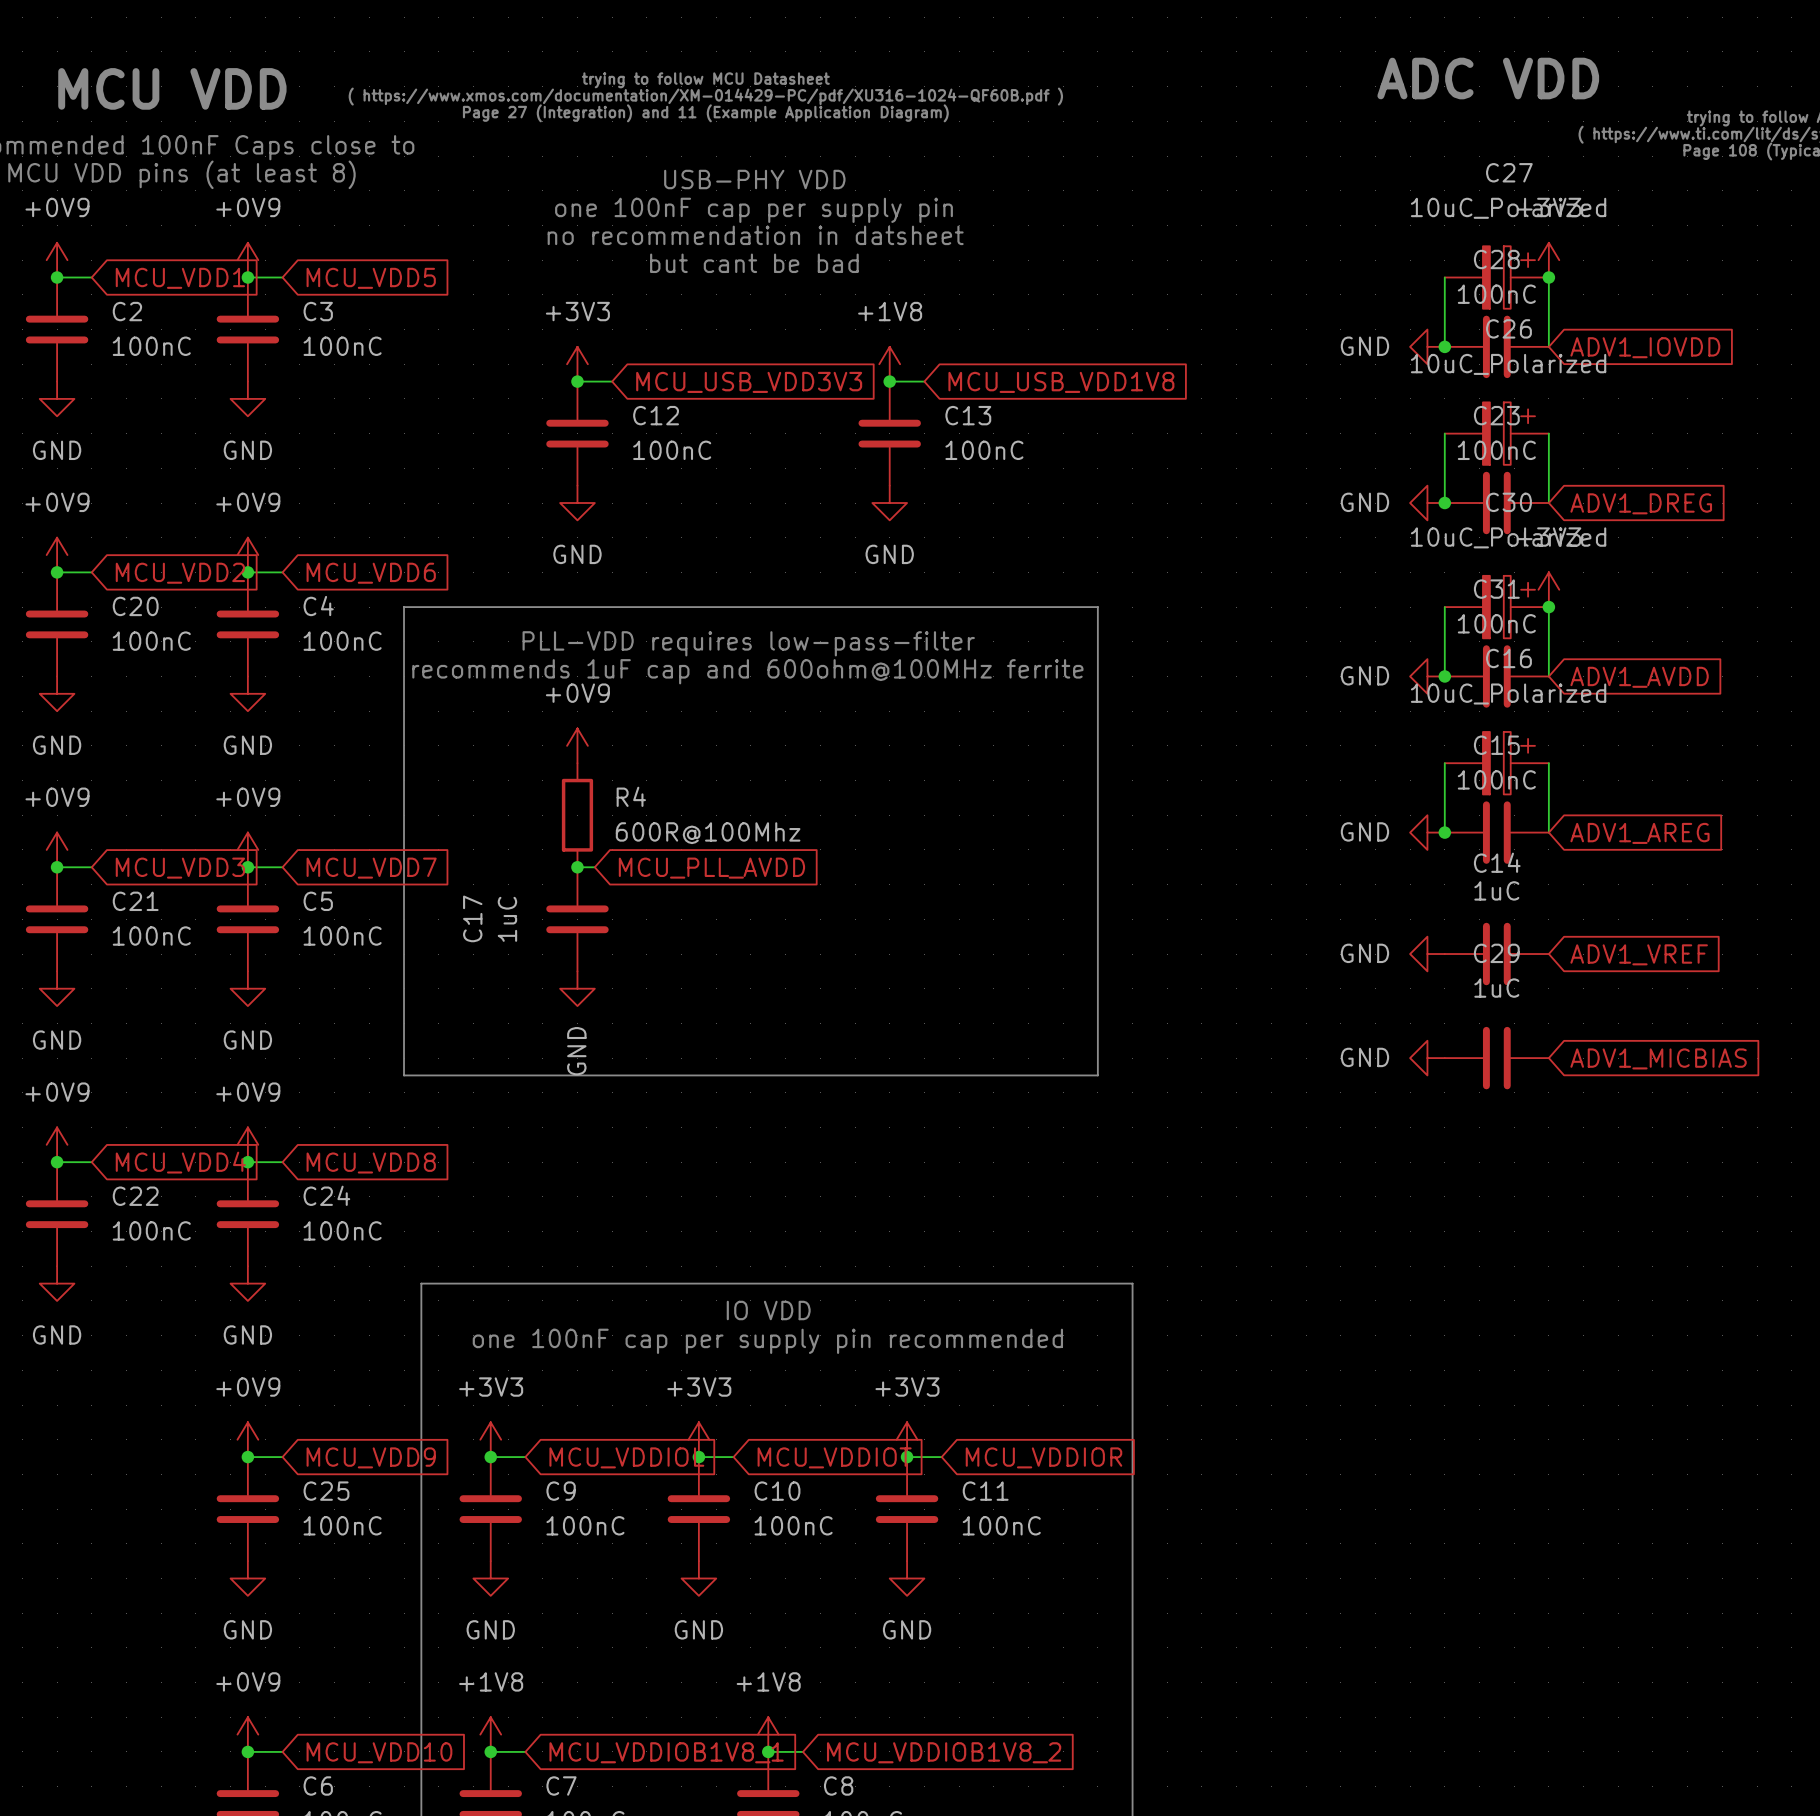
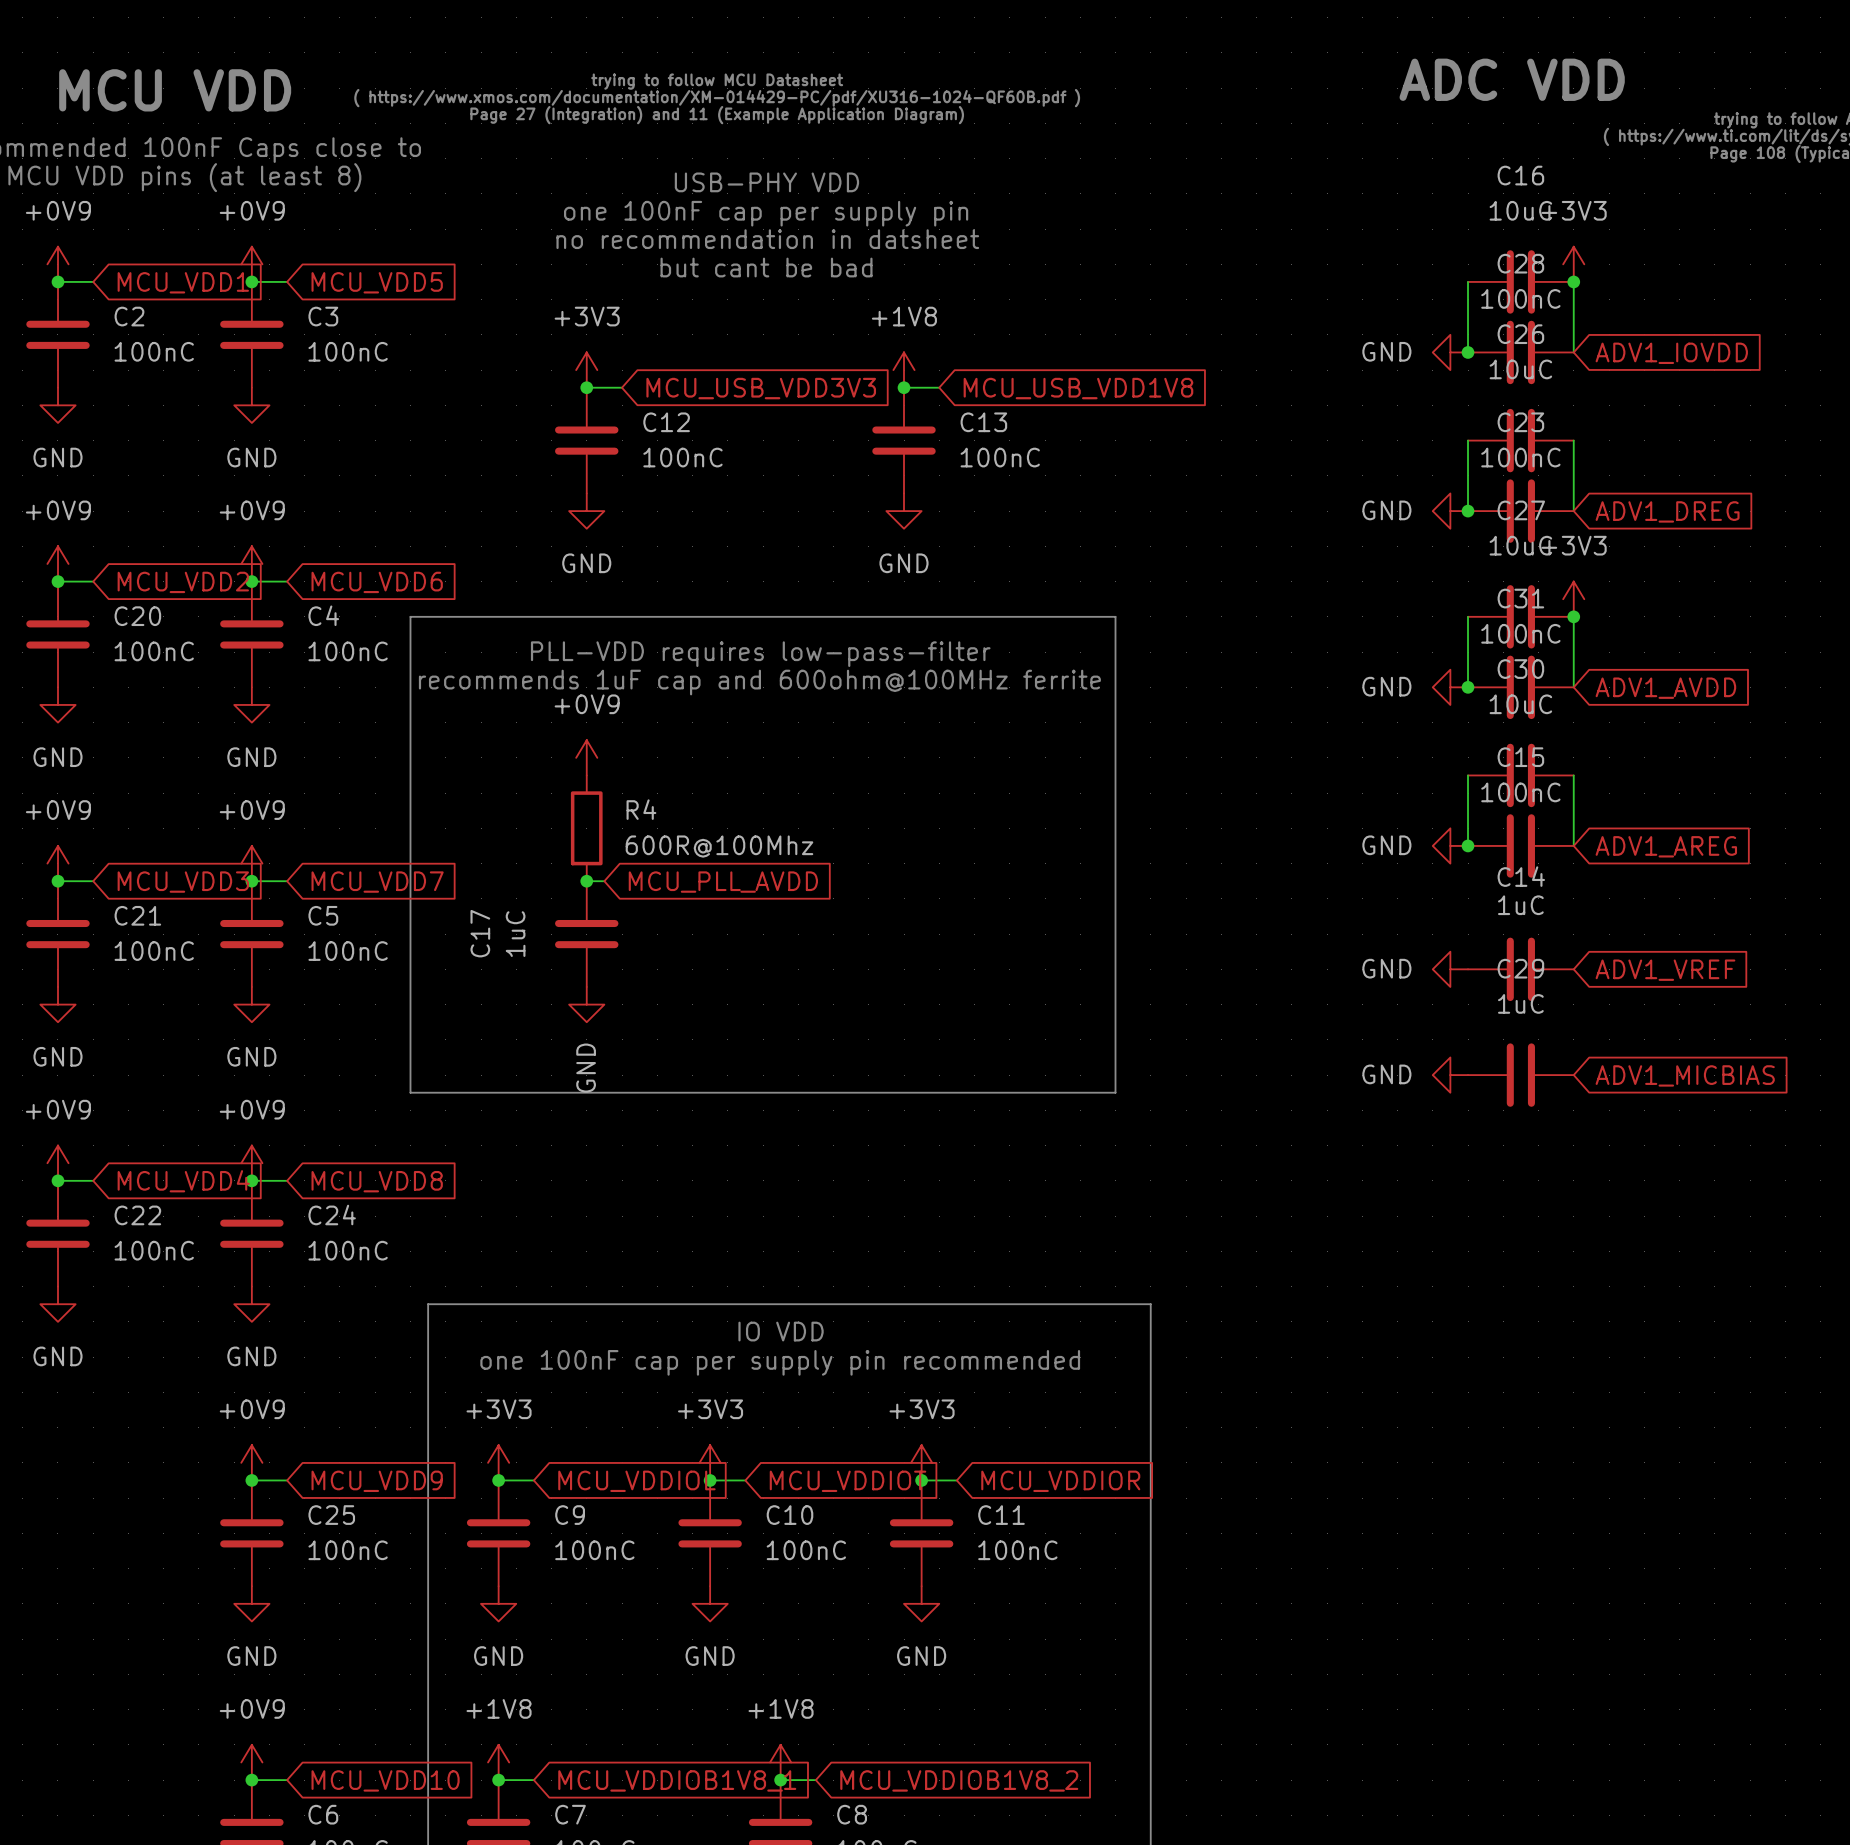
C27 value: 10uC_Polarized (1508, 208) -> 10uC (1520, 545)
C27 symbol: [1444, 246, 1549, 309] -> [1468, 585, 1574, 649]
C26 value: 10uC_Polarized (1508, 364) -> 10uC (1520, 369)
C26 symbol: [1444, 402, 1549, 465] -> [1468, 408, 1574, 473]
C30 value: 10uC_Polarized (1508, 537) -> 10uC (1520, 704)
C30 symbol: [1444, 575, 1549, 639] -> [1468, 743, 1574, 808]
C16 value: 10uC_Polarized (1508, 693) -> 10uC (1520, 210)
C16 symbol: [1444, 731, 1549, 795] -> [1468, 250, 1574, 314]

